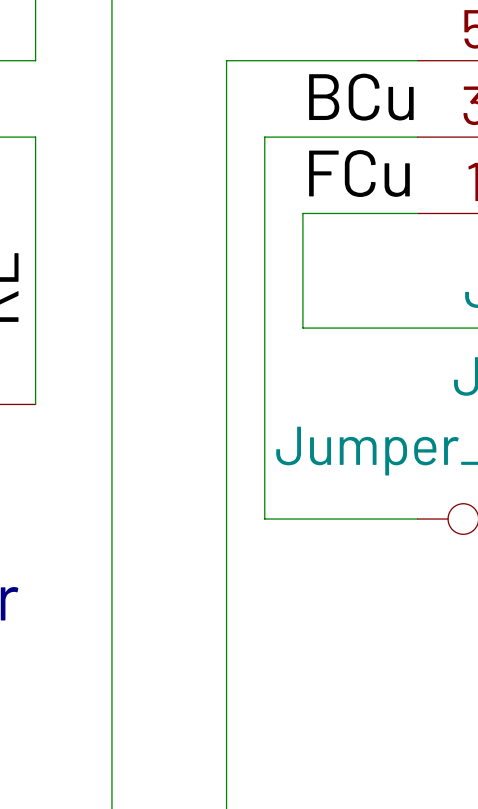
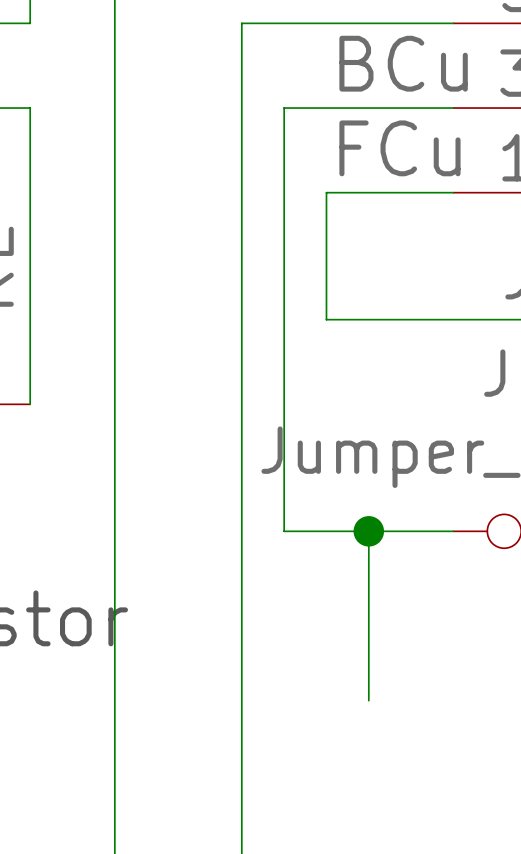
wire: none -> (368, 531) (368, 700)
junction: none -> (368, 531)

